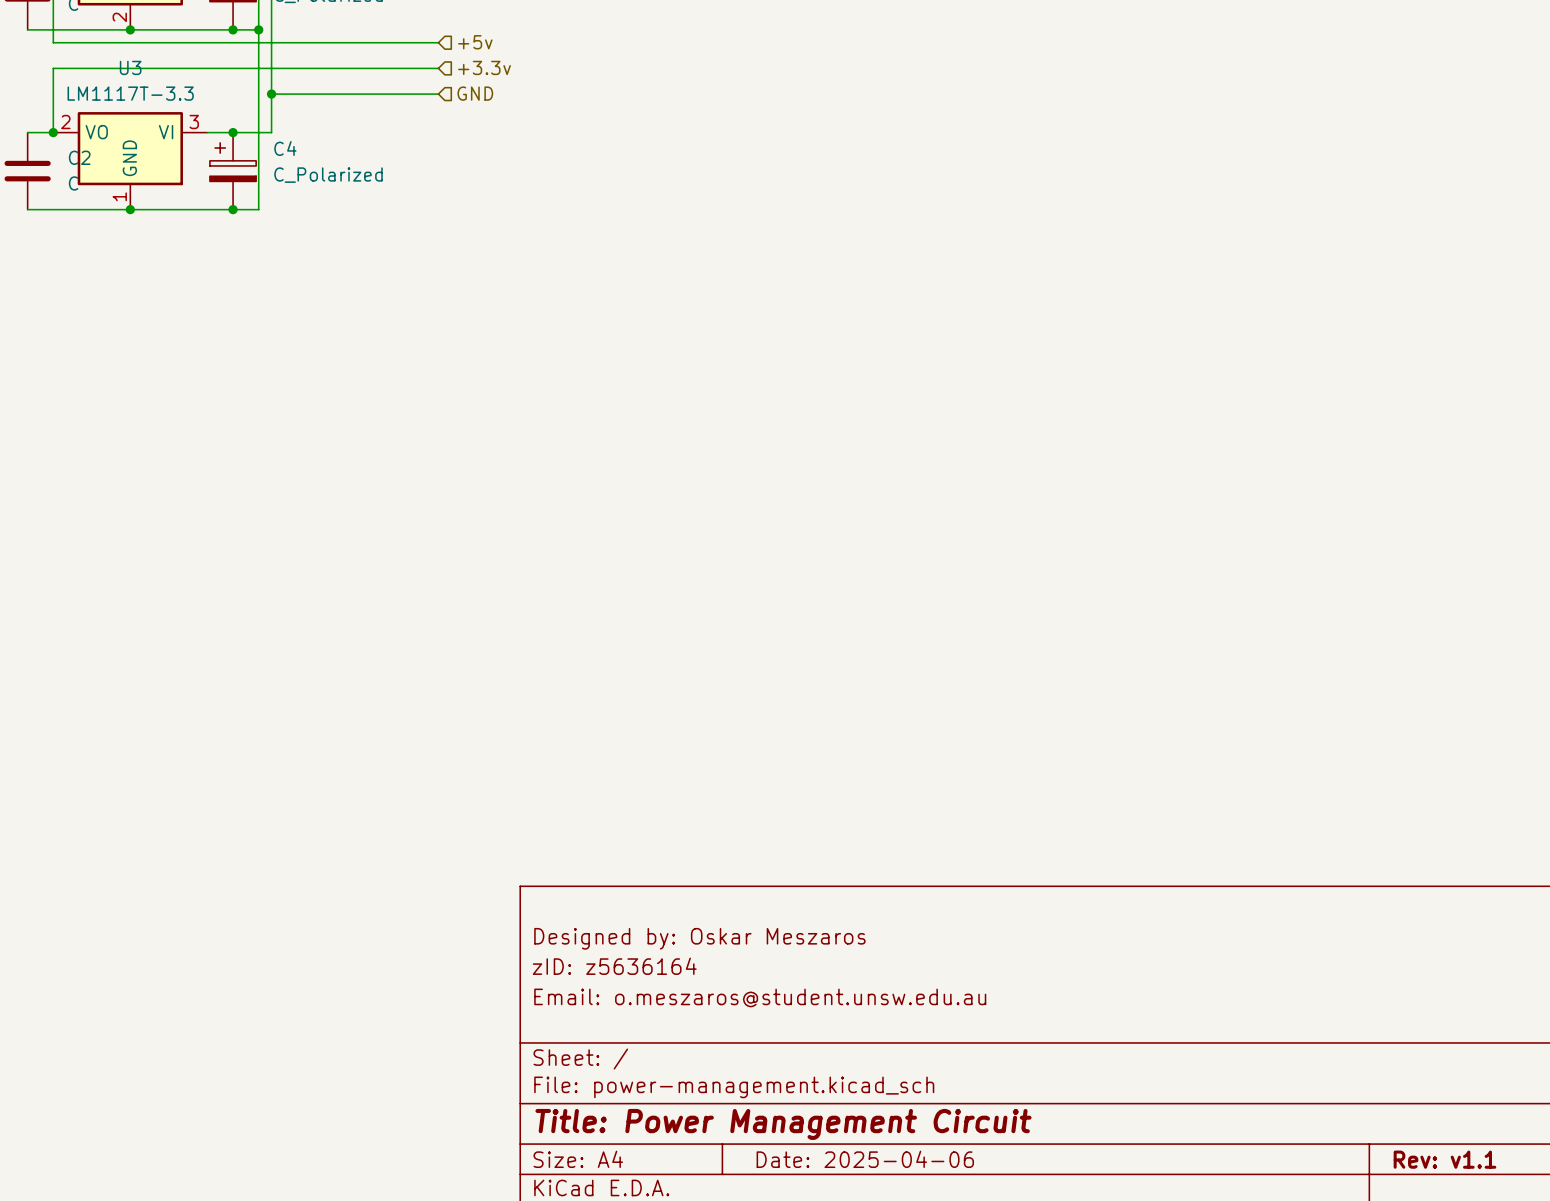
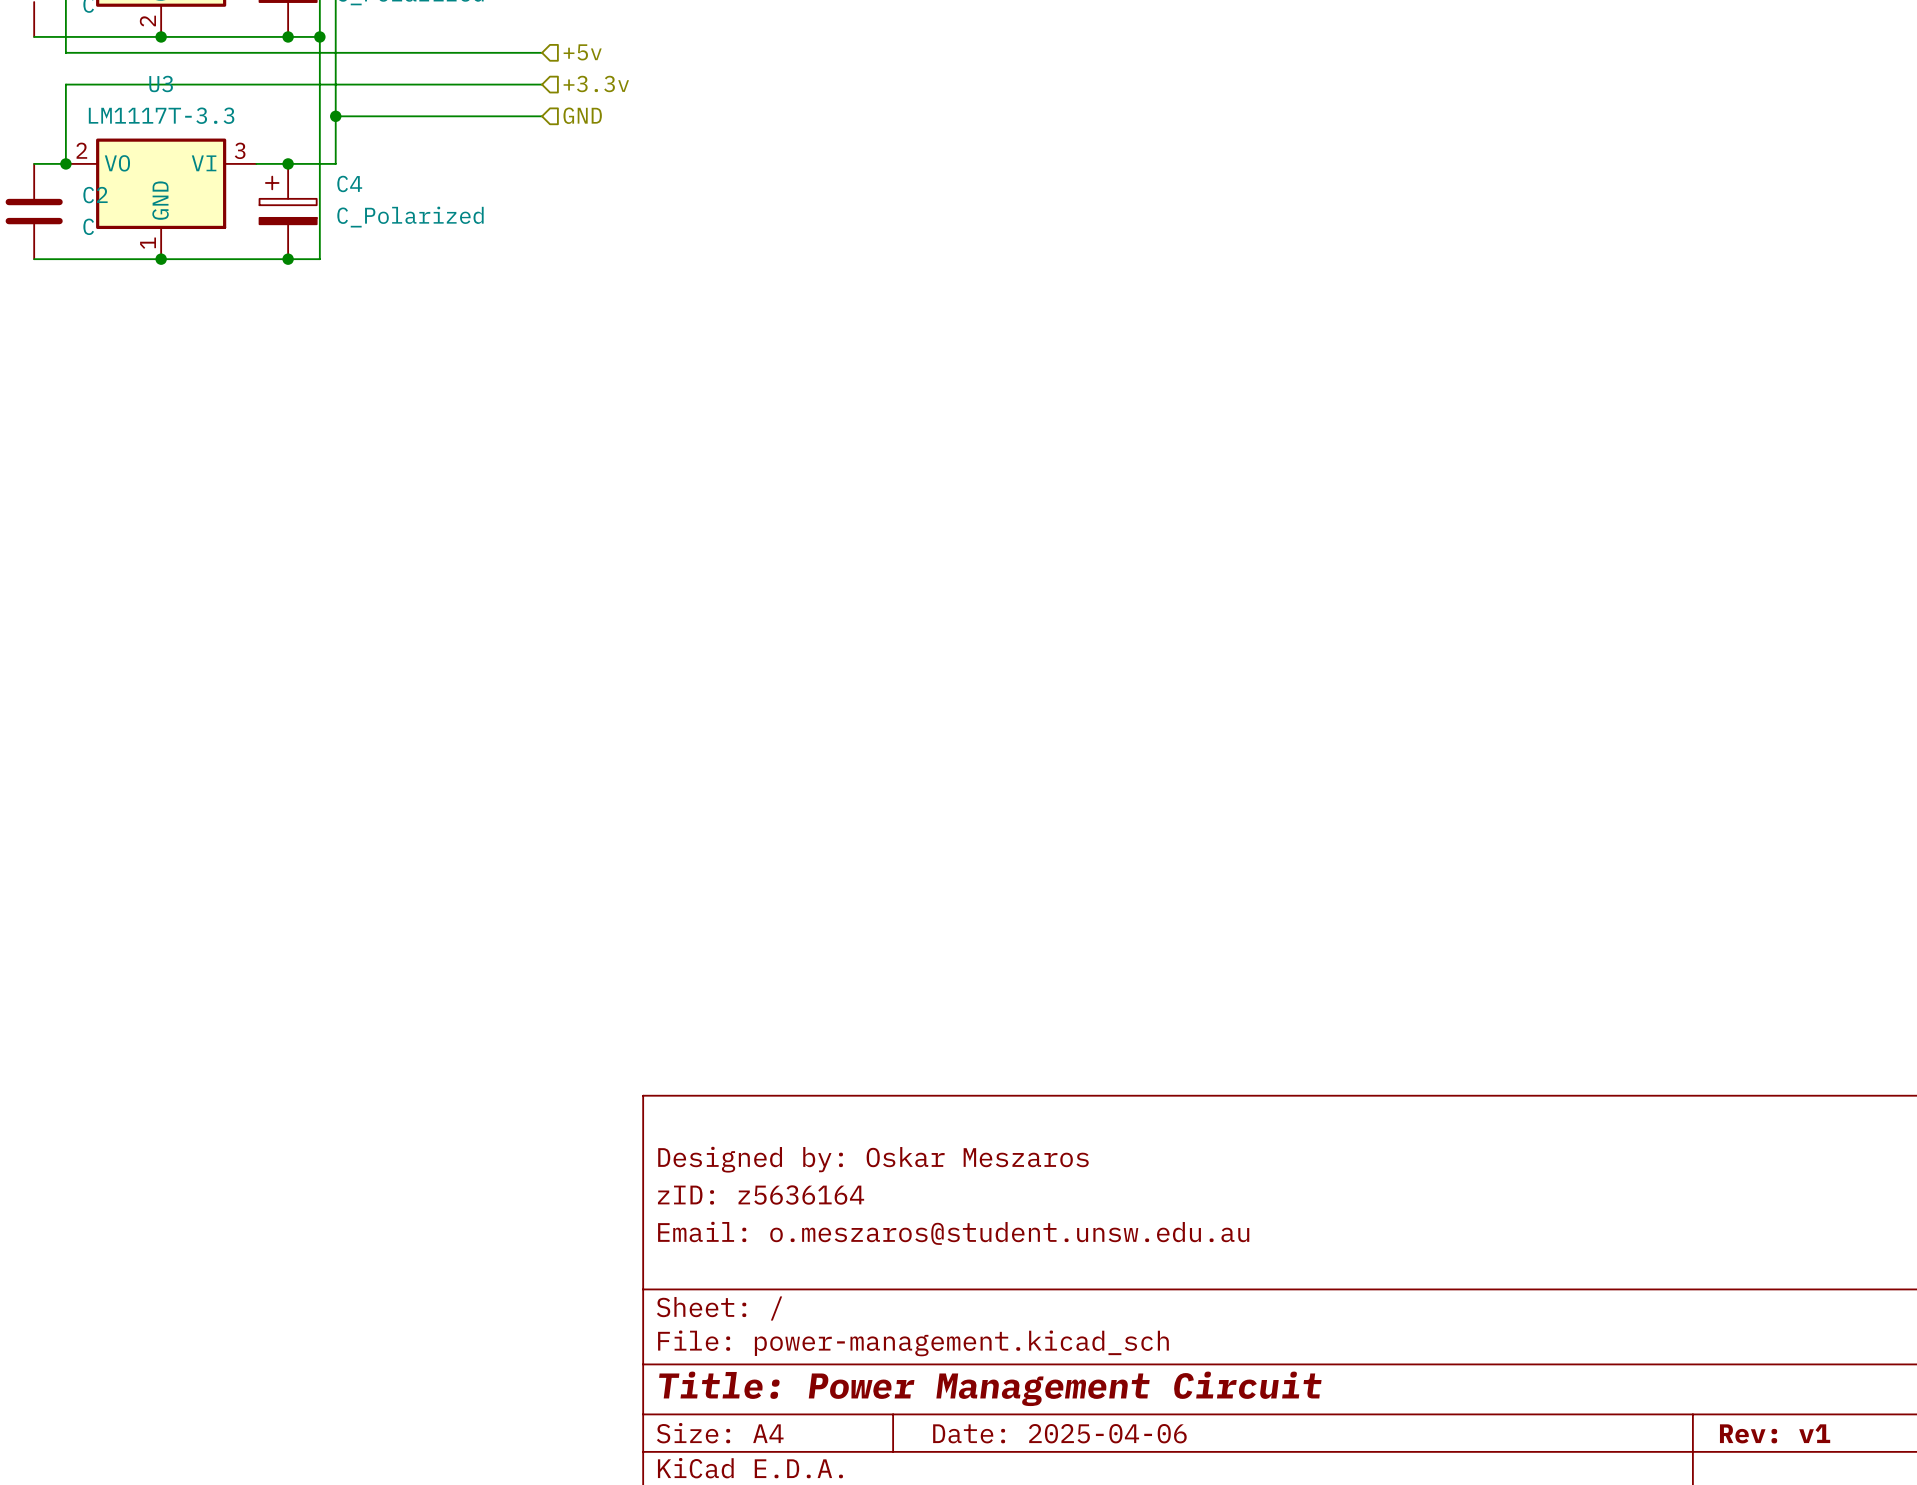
title block: Rev: v1.1 (1444, 1159) -> Rev: v1 (1775, 1433)

